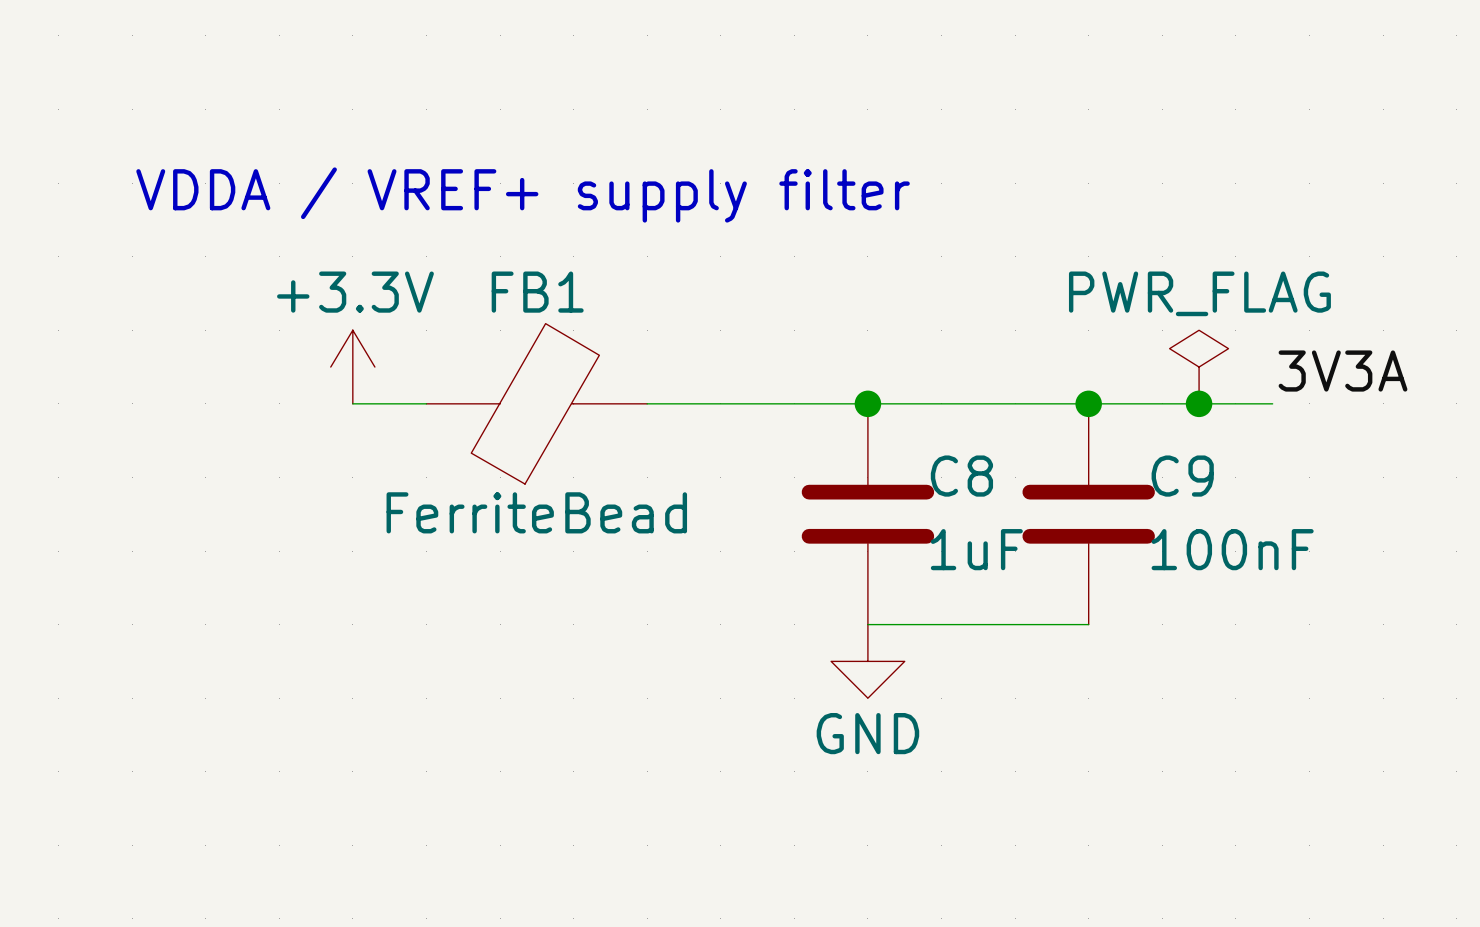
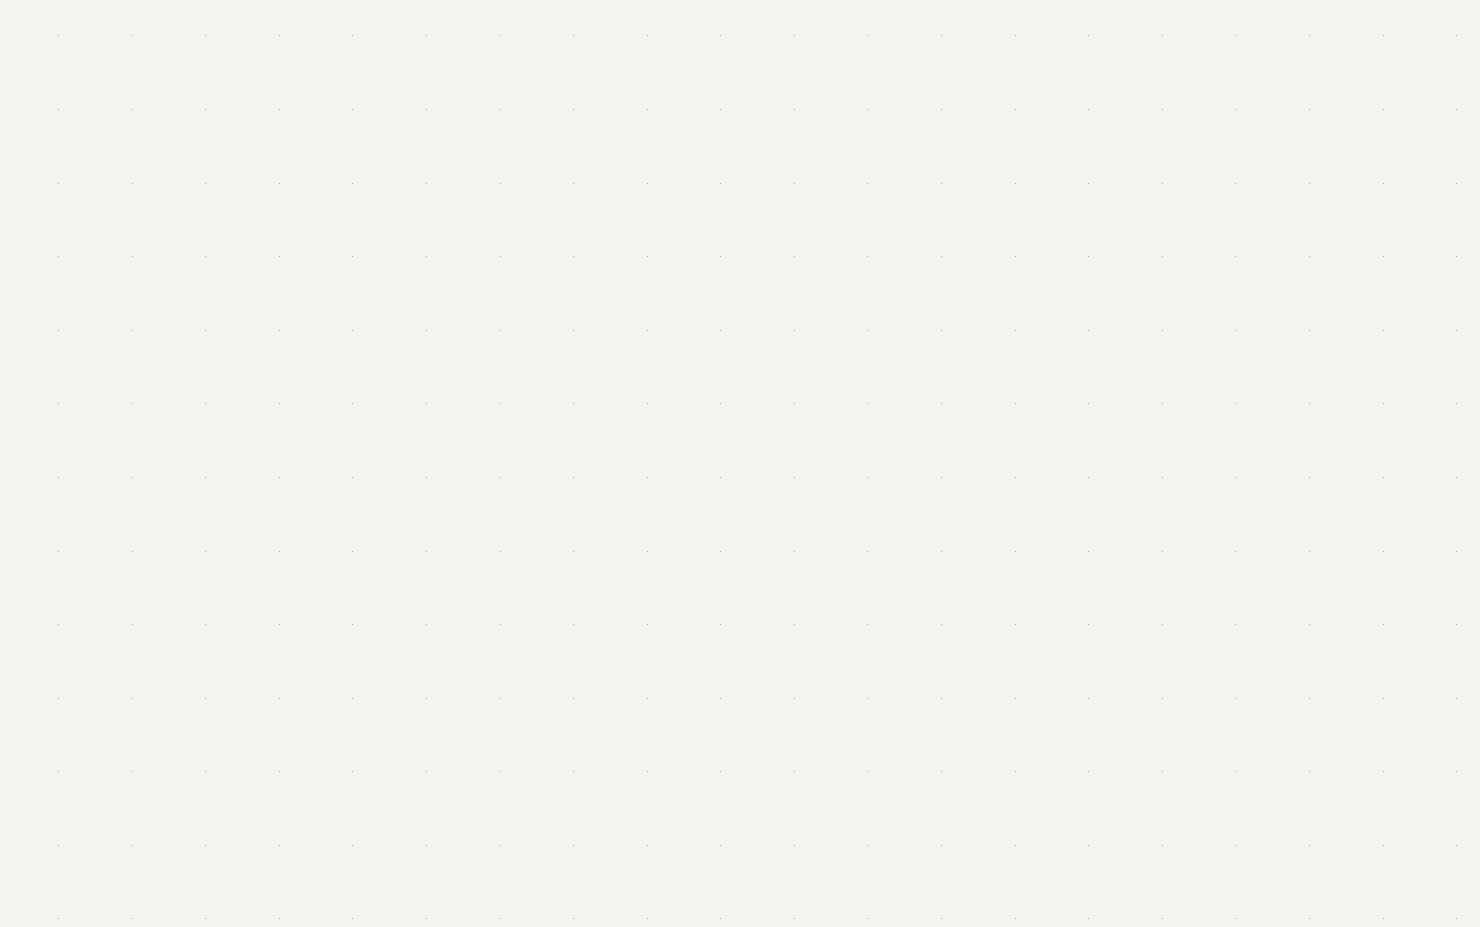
text: VDDA / VREF+ supply filter (523, 194) -> none
power symbol: +3.3V (352, 367) -> none
power symbol: PWR_FLAG (1199, 367) -> none
label: 3V3A (1343, 371) -> none
wire: (352, 403) (426, 403) -> none
FB1: FerriteBead (536, 403) -> none
wire: (647, 403) (1272, 403) -> none
junction: (867, 403) -> none
junction: (1088, 403) -> none
junction: (1199, 403) -> none
C8: 1uF (867, 514) -> none
C9: 100nF (1088, 514) -> none
wire: (867, 624) (1088, 624) -> none
power symbol: GND (867, 661) -> none

